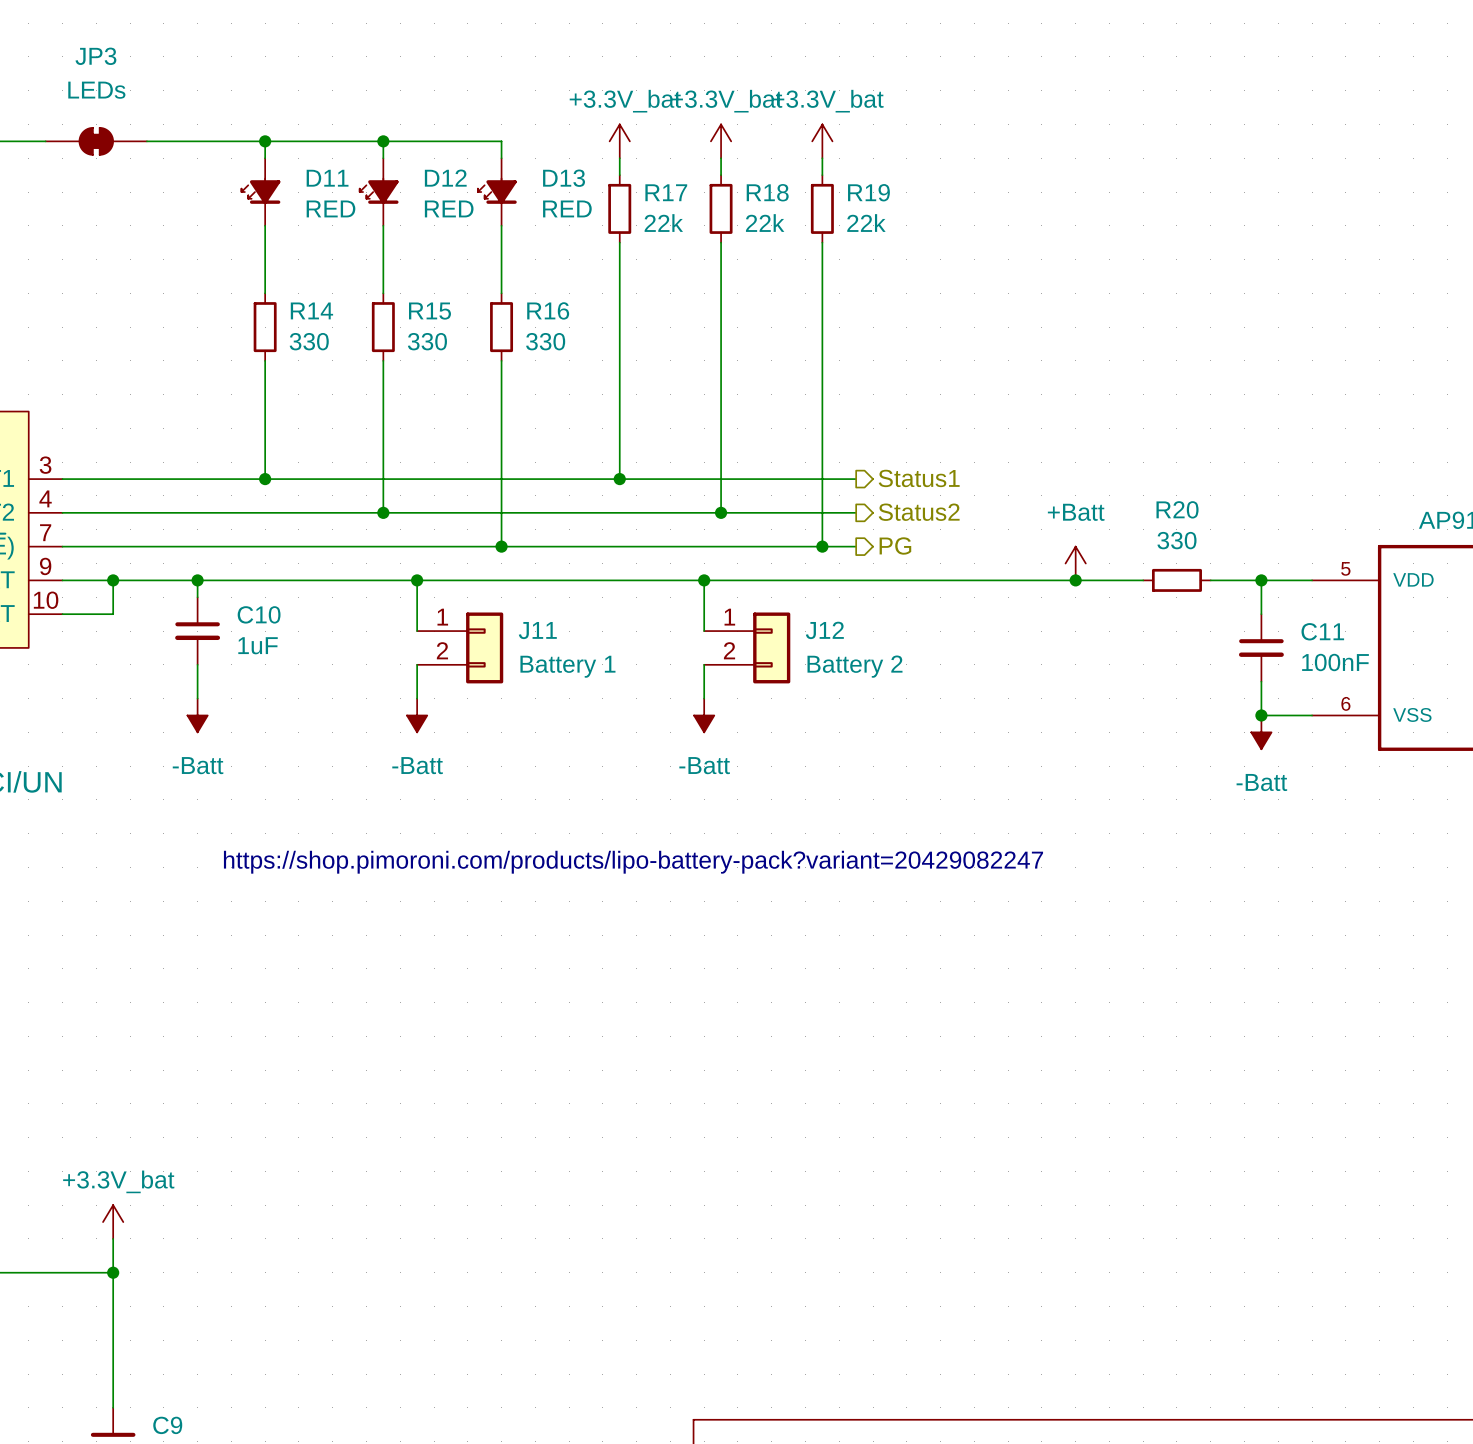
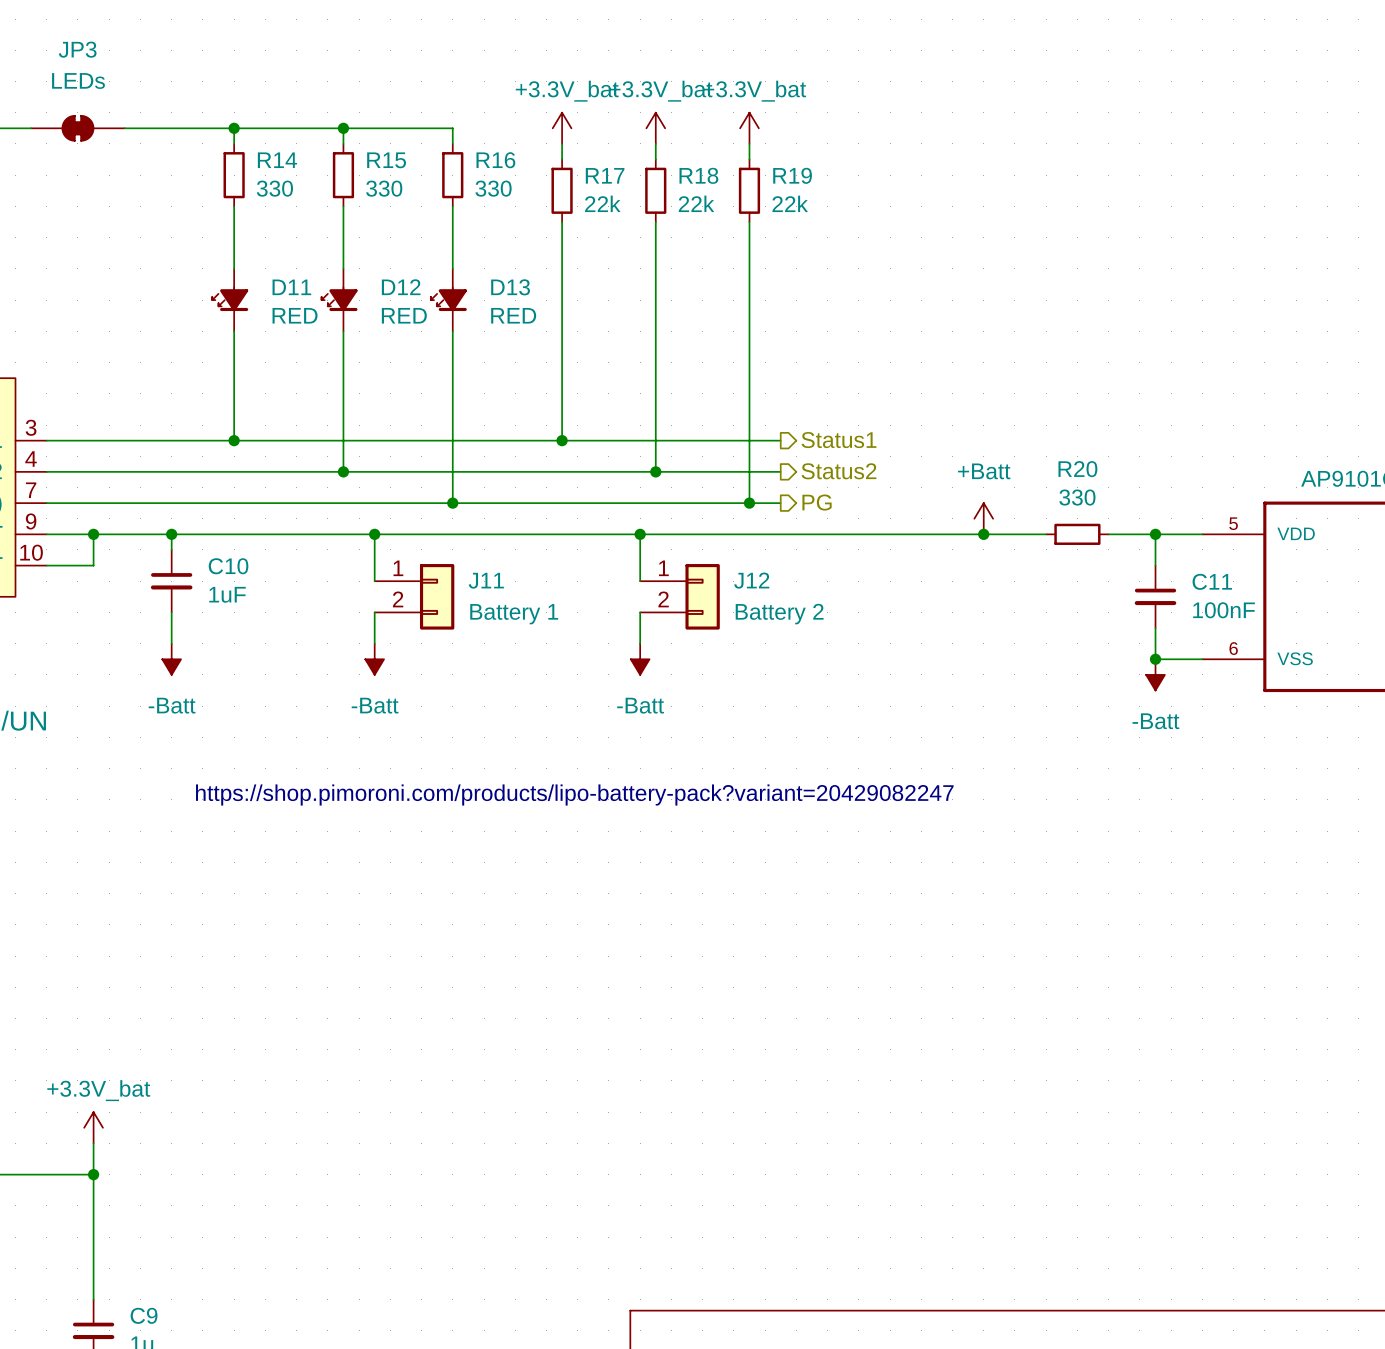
D11 position: (260, 192) -> (230, 300)
D12 position: (379, 192) -> (339, 300)
D13 position: (497, 192) -> (448, 300)
R14 position: (265, 327) -> (234, 175)
R15 position: (383, 327) -> (343, 175)
R16 position: (501, 327) -> (452, 175)

